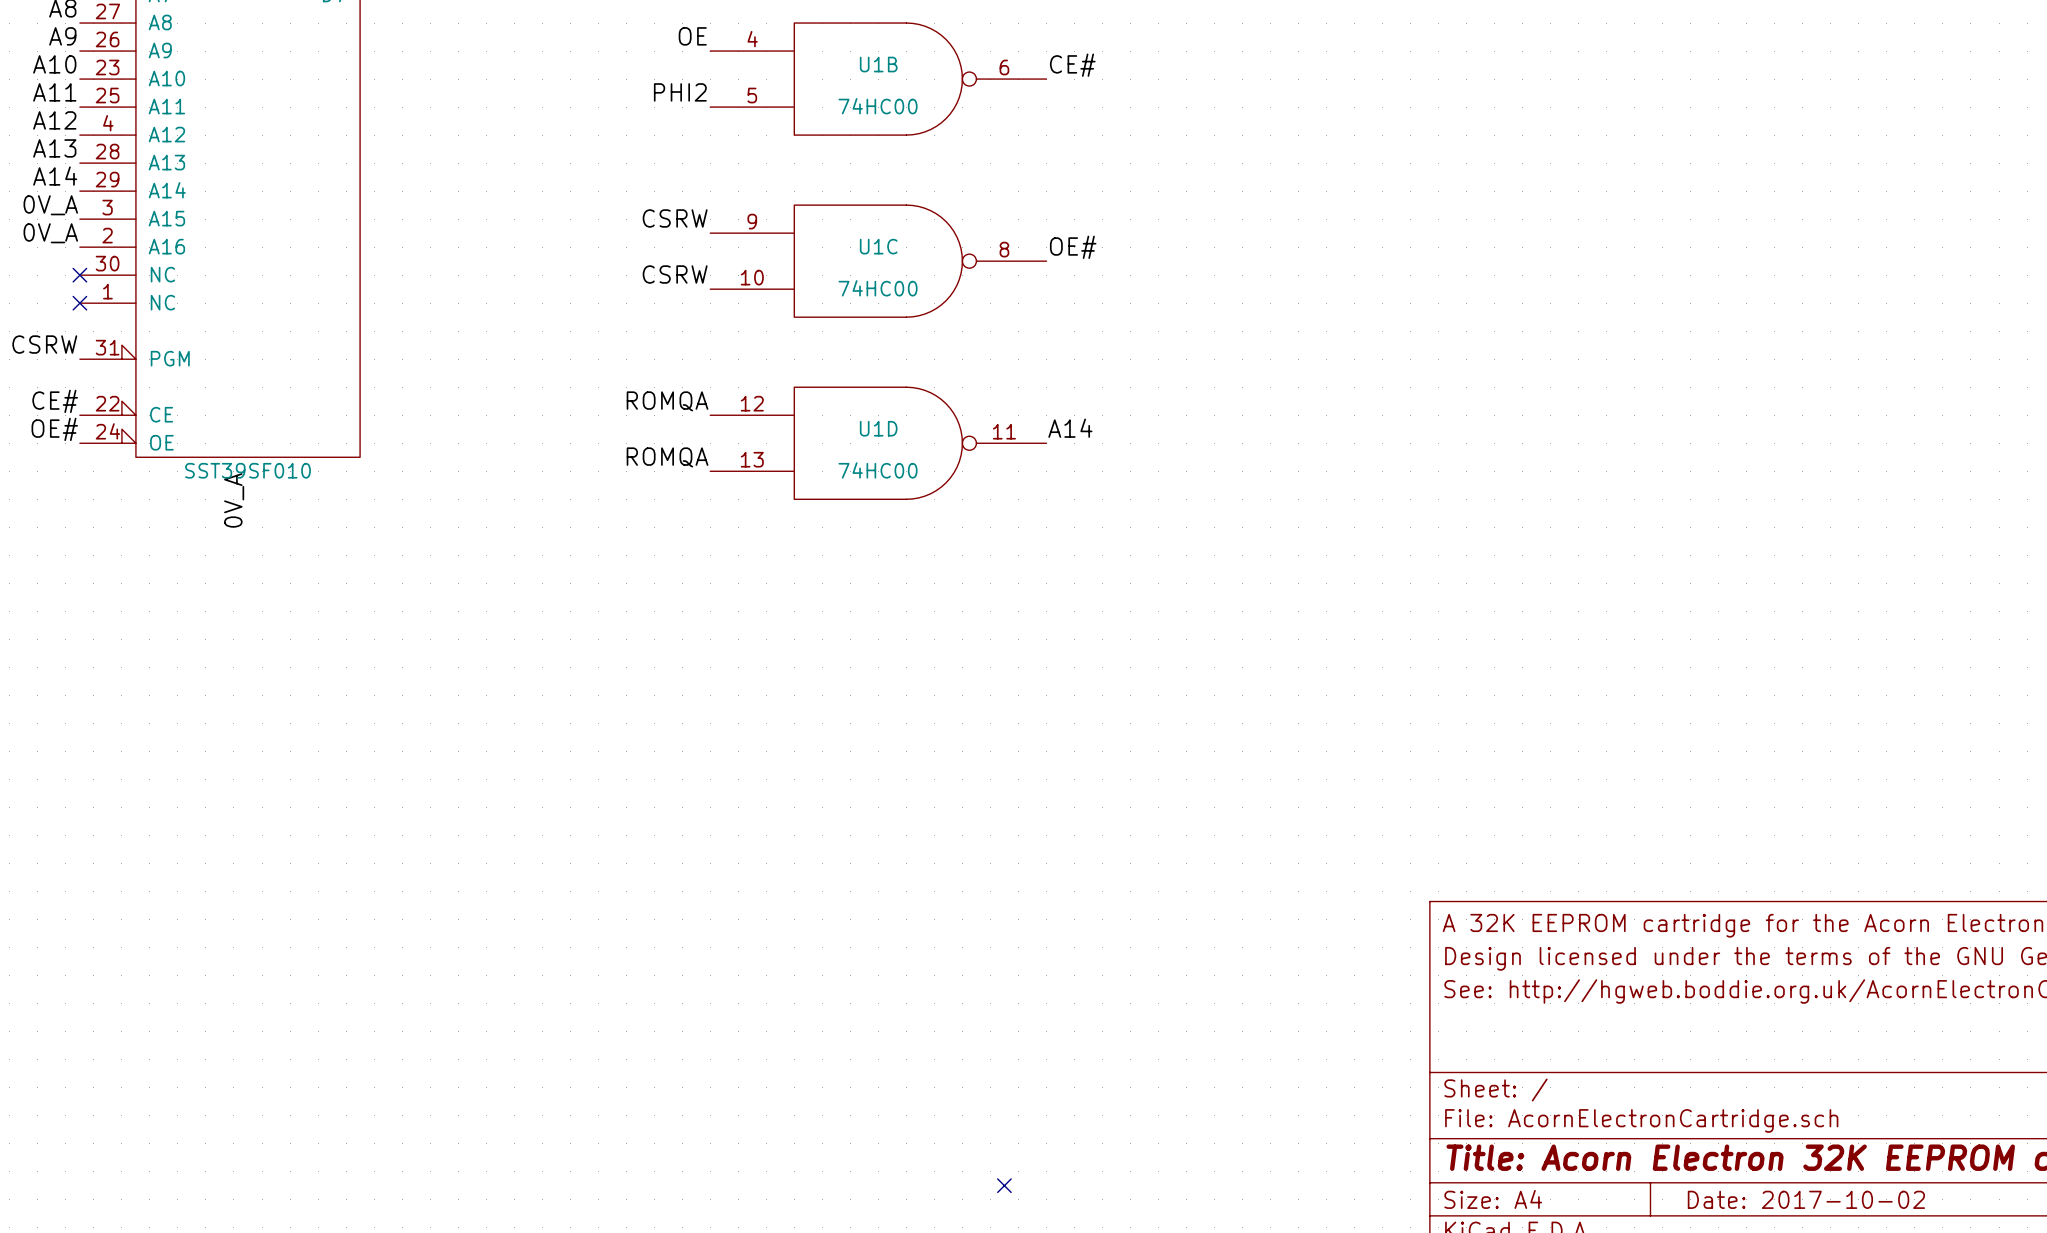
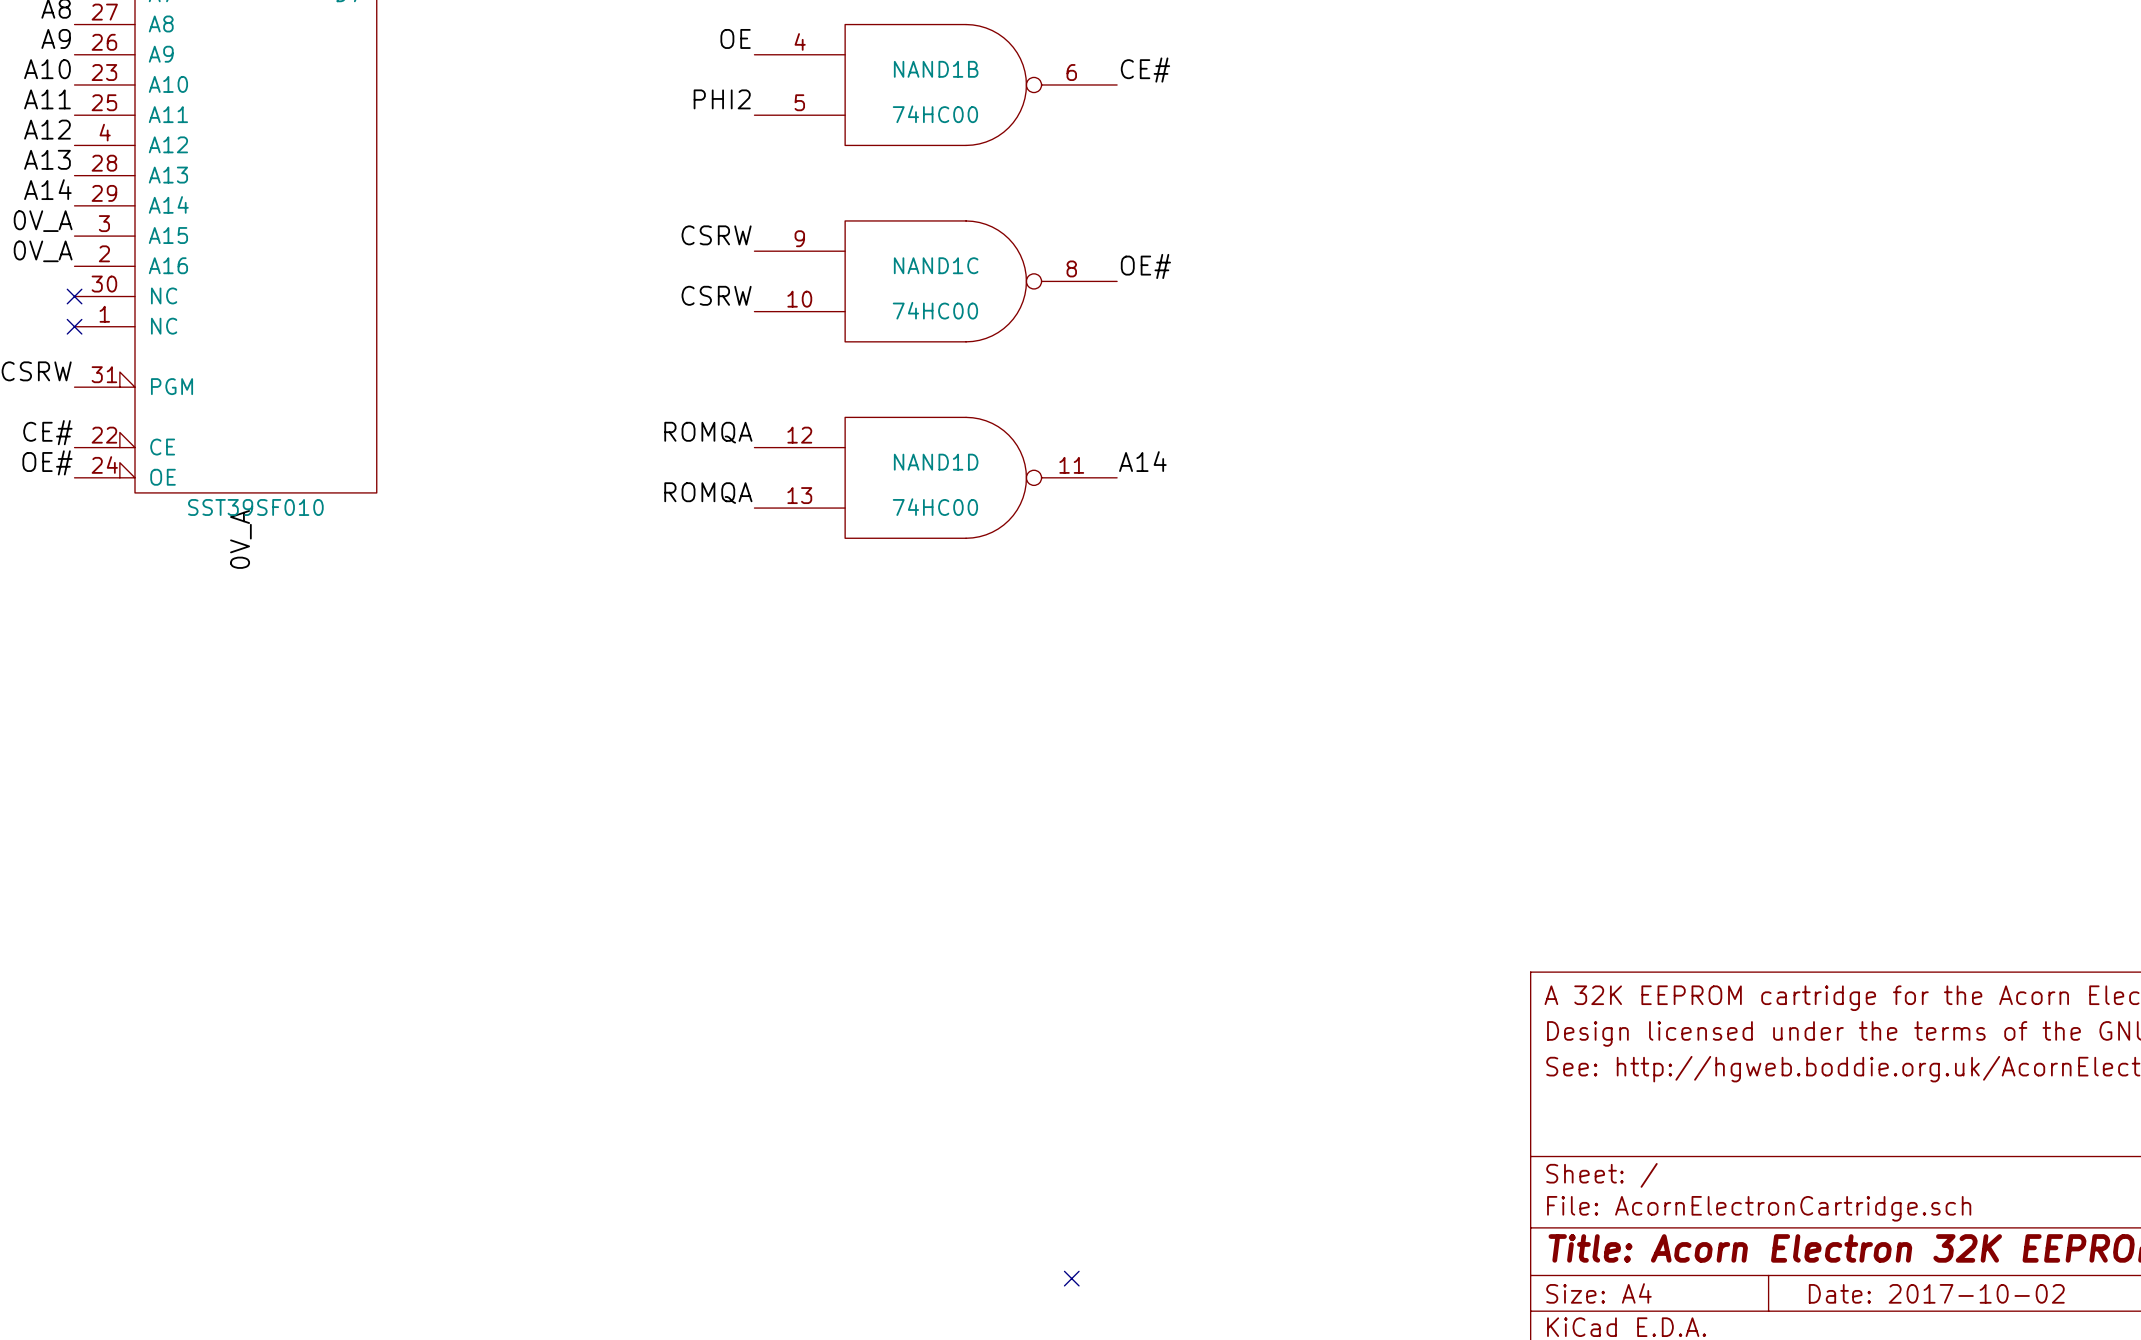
U1B name: U1B (878, 64) -> NAND1B (936, 69)
U1C name: U1C (878, 246) -> NAND1C (936, 265)
U1D name: U1D (878, 428) -> NAND1D (936, 462)

